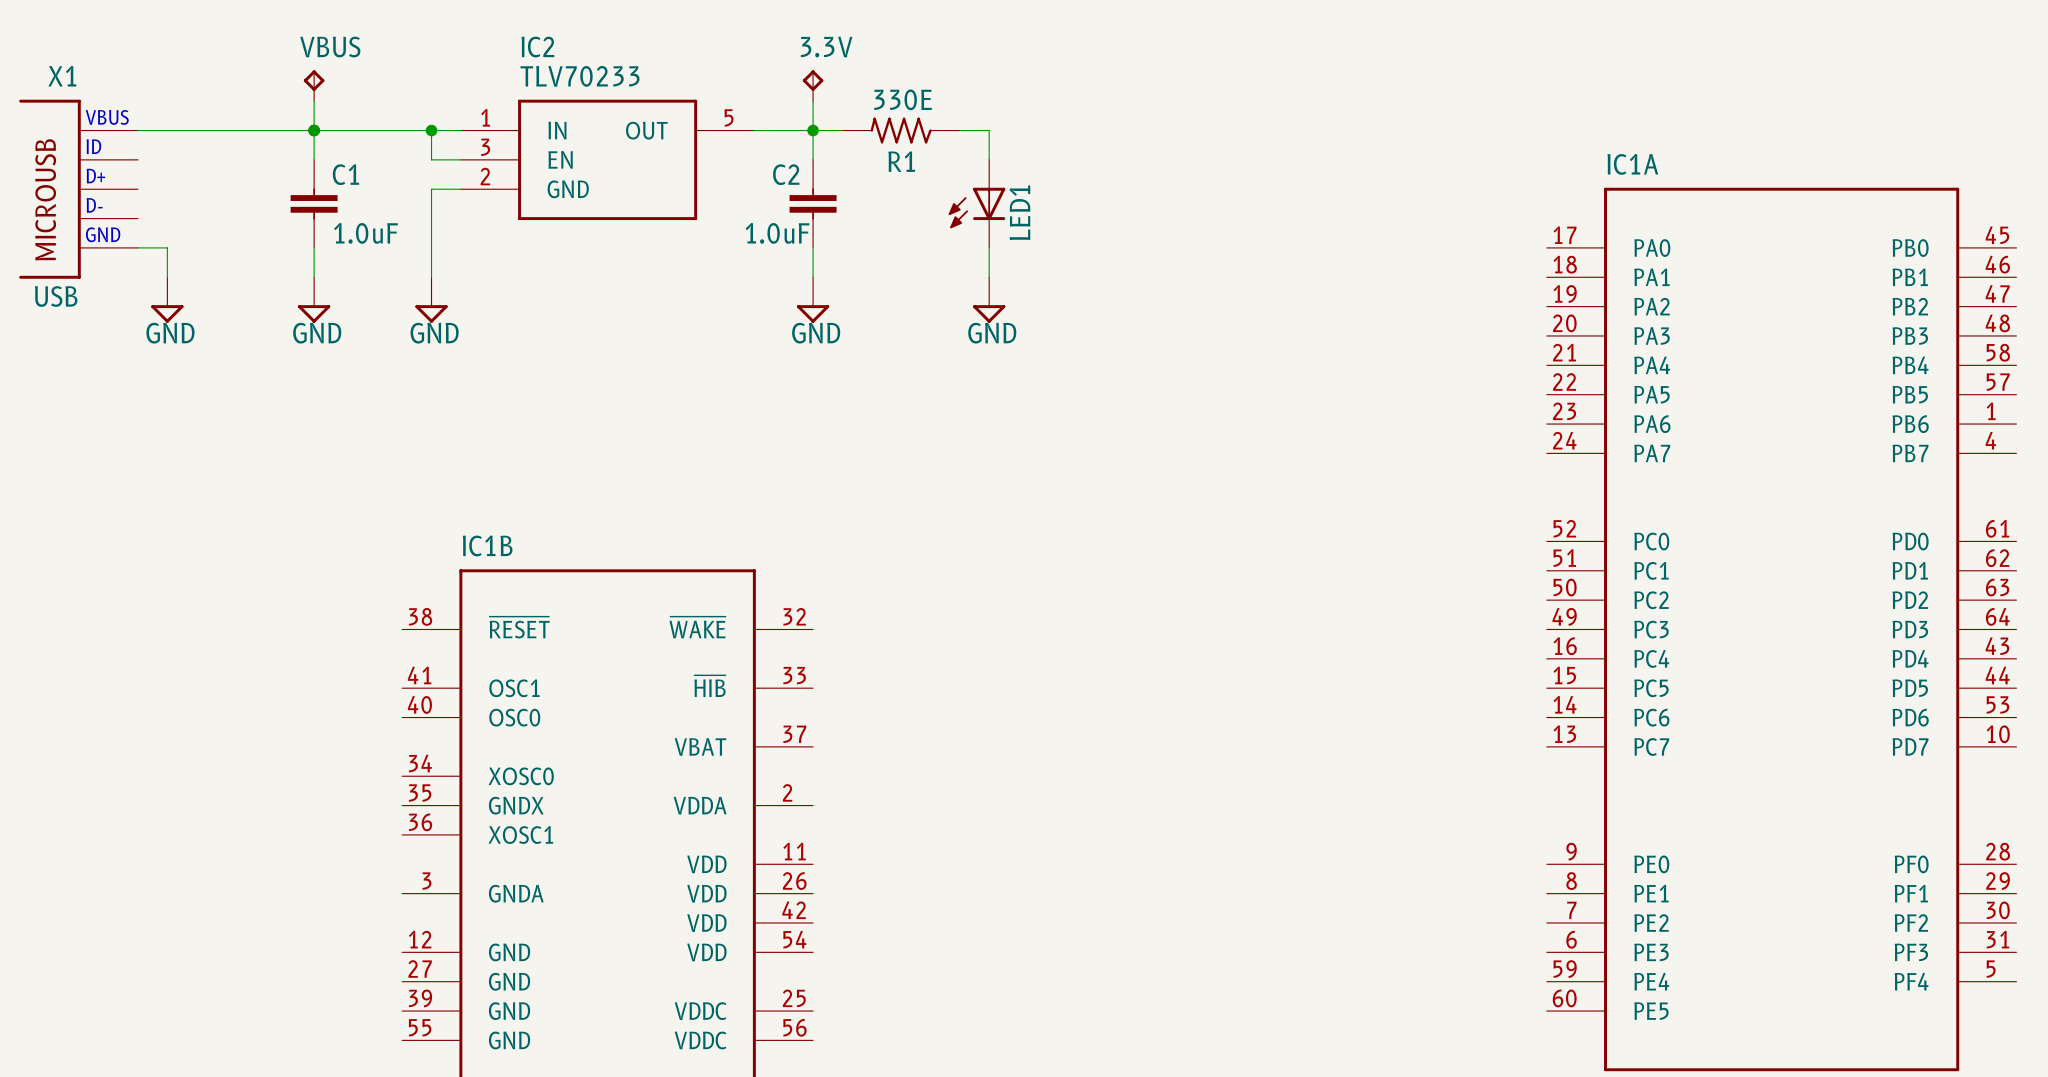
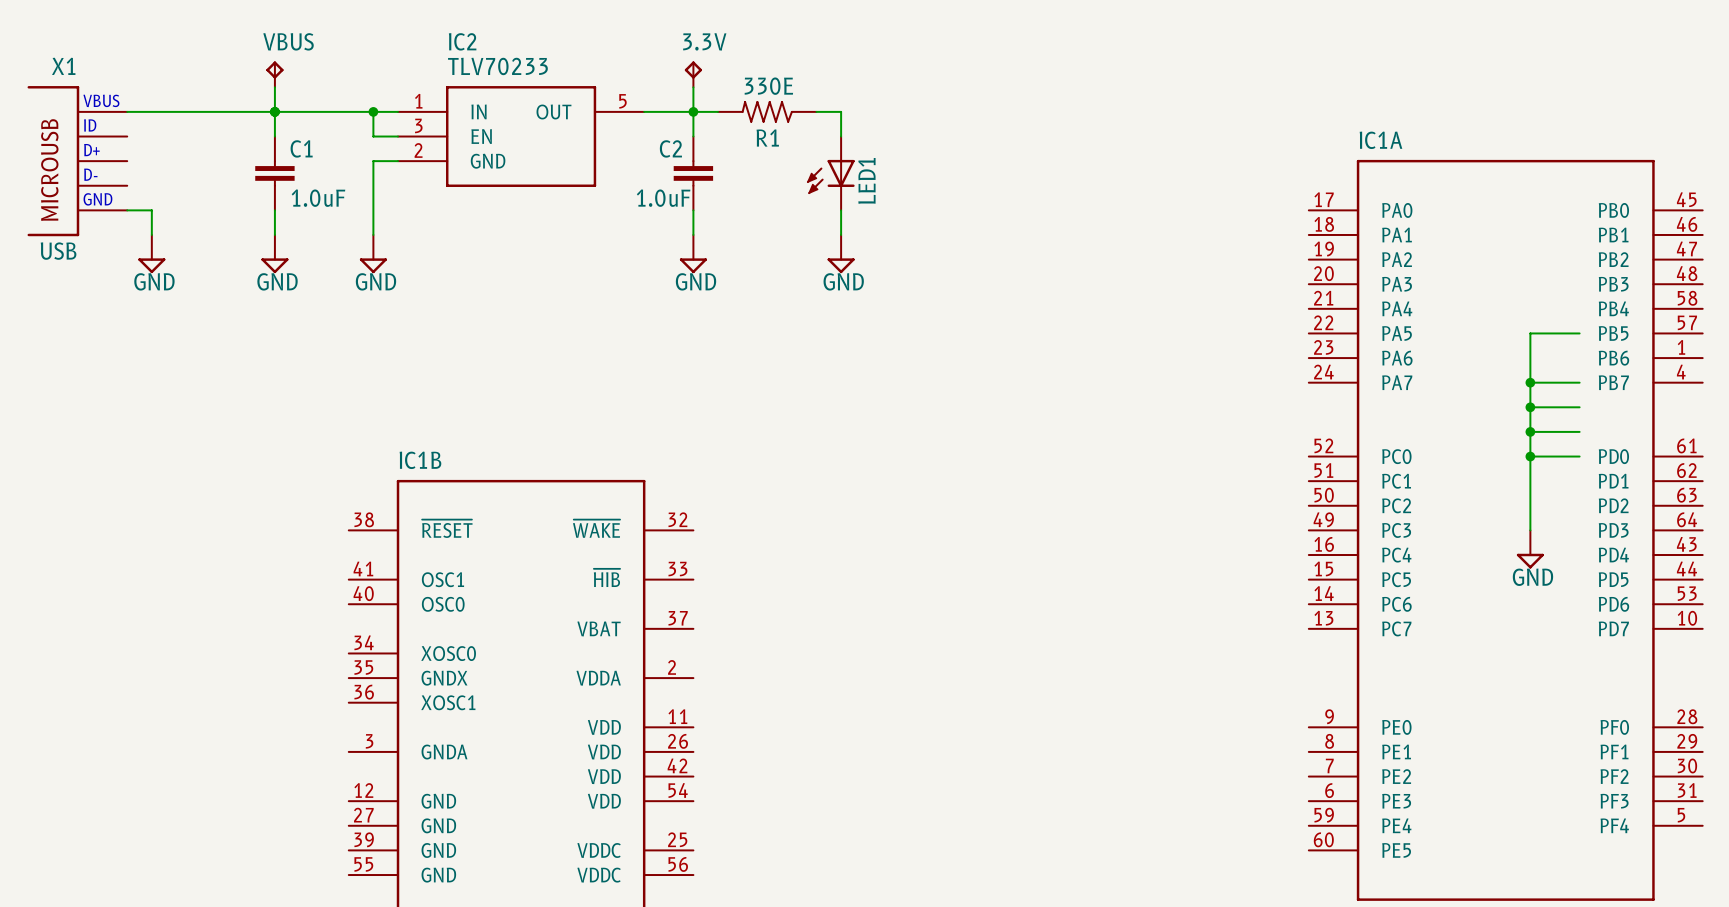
wire: none -> (1579, 333) (1530, 333) (1530, 530)
wire: none -> (1530, 382) (1579, 382)
junction: none -> (1530, 382)
wire: none -> (1530, 407) (1579, 407)
junction: none -> (1530, 407)
wire: none -> (1530, 431) (1579, 431)
junction: none -> (1530, 431)
wire: none -> (1530, 456) (1579, 456)
junction: none -> (1530, 456)
power symbol: none -> GND (1530, 549)

